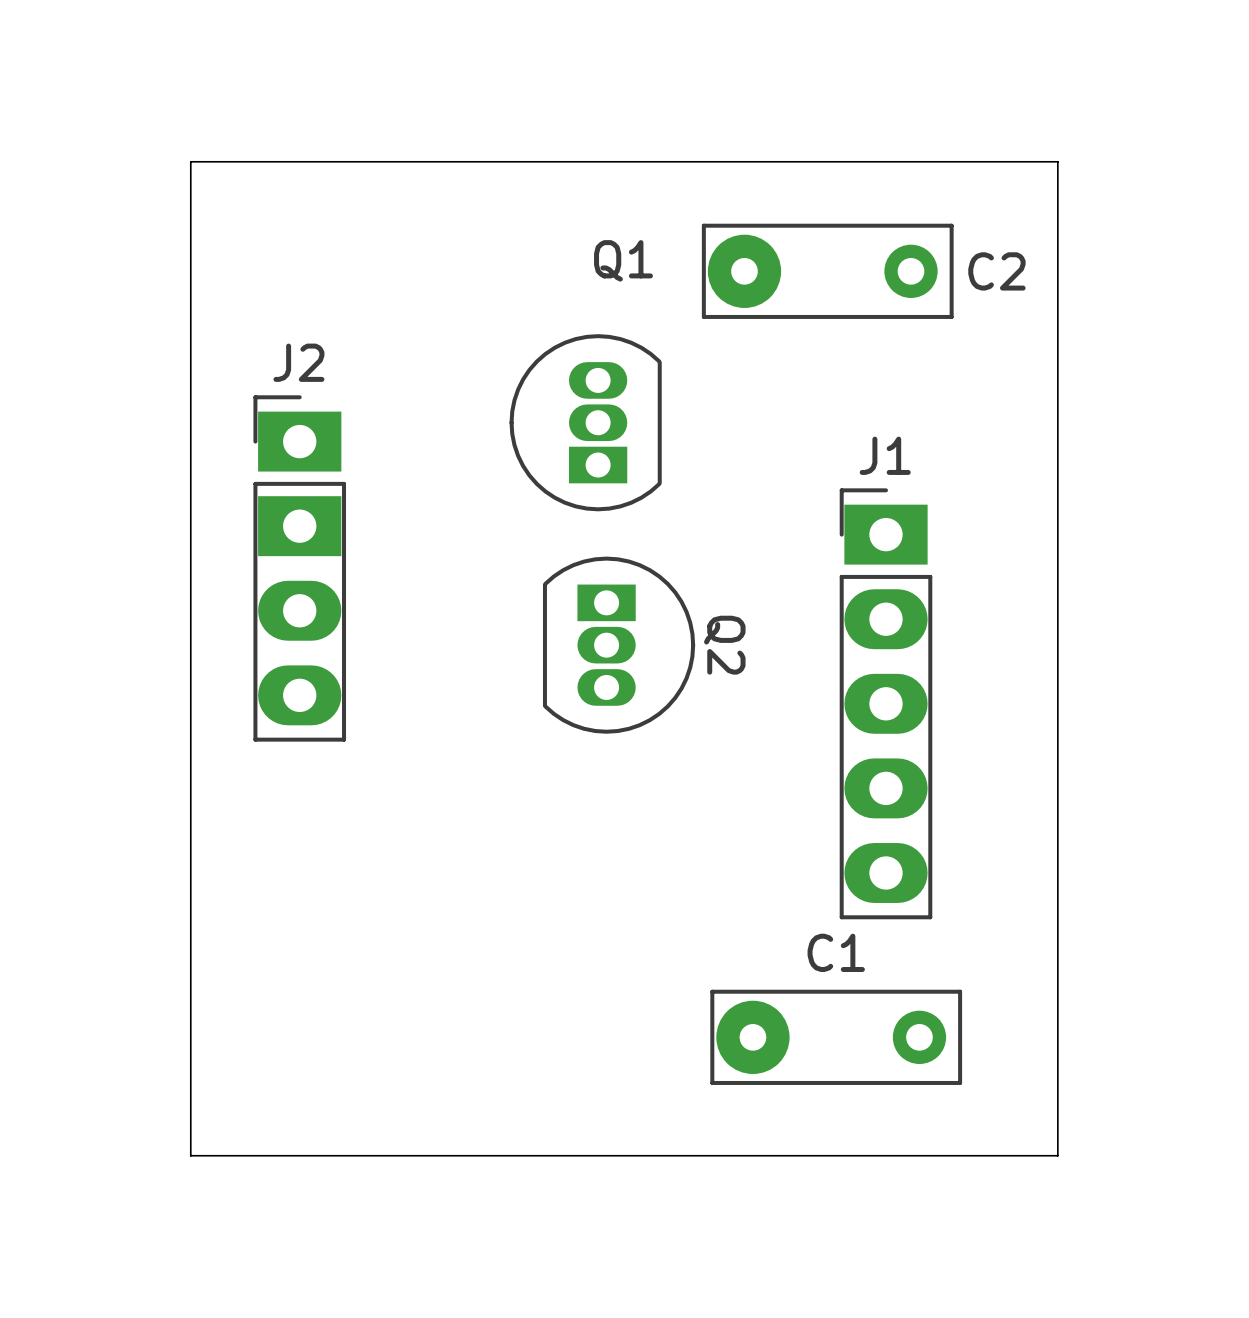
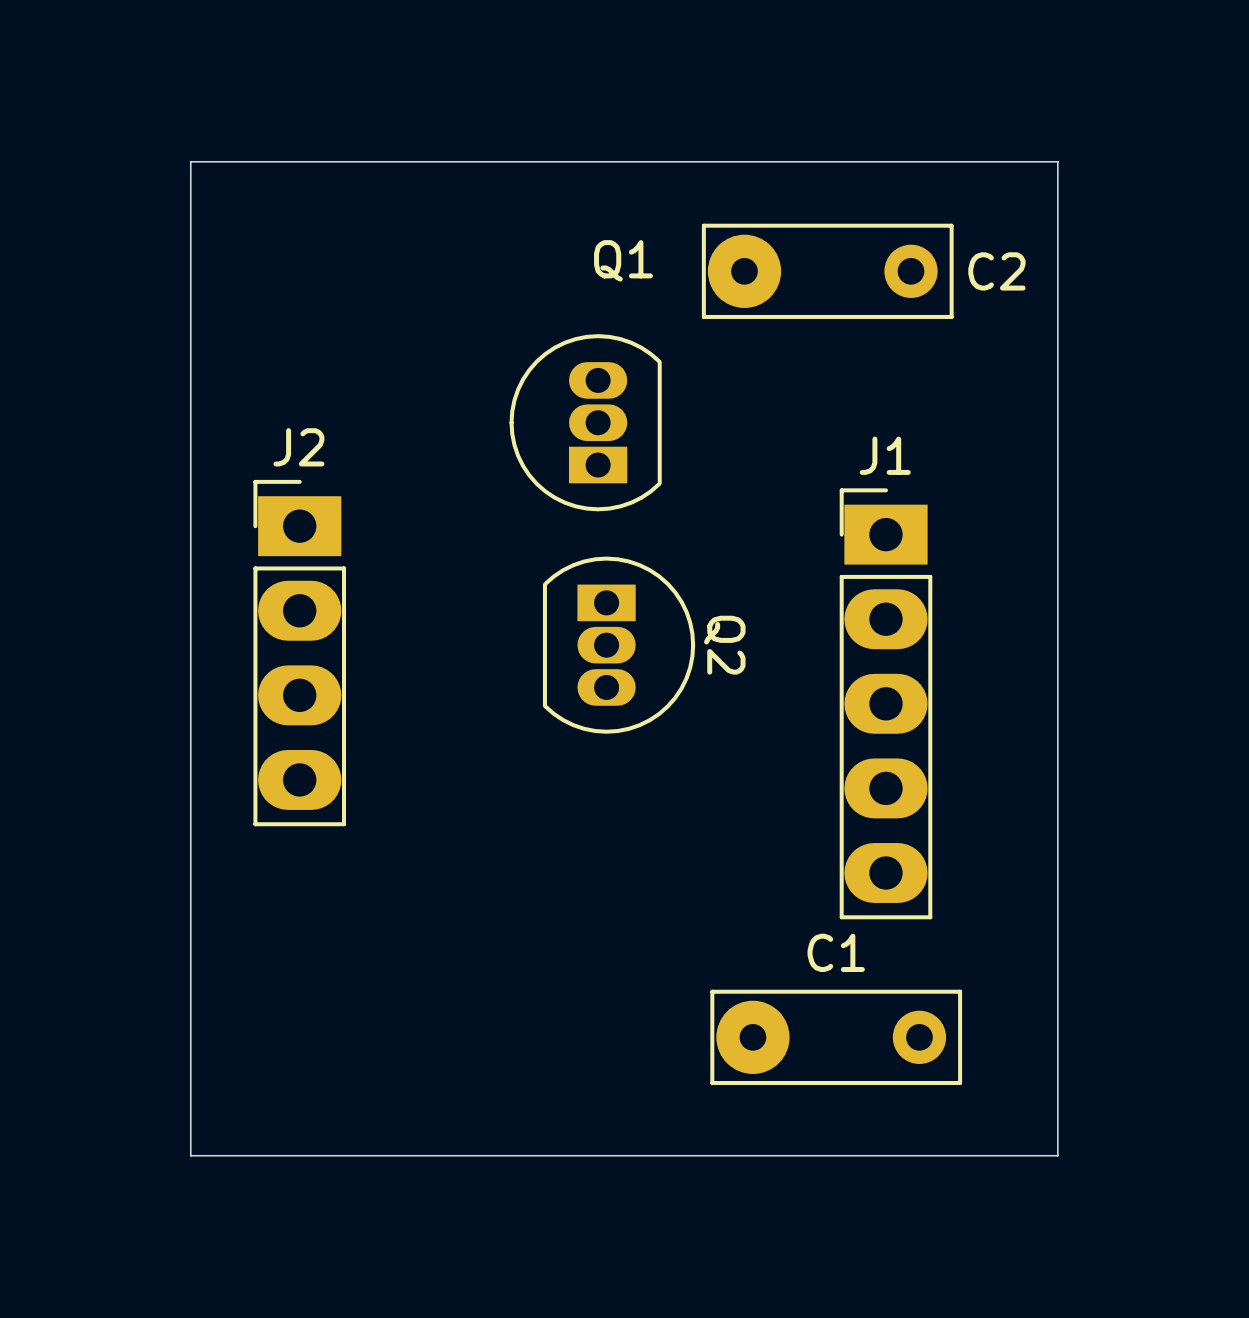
J2 footprint: [253, 395, 347, 742] -> [253, 479, 347, 827]

